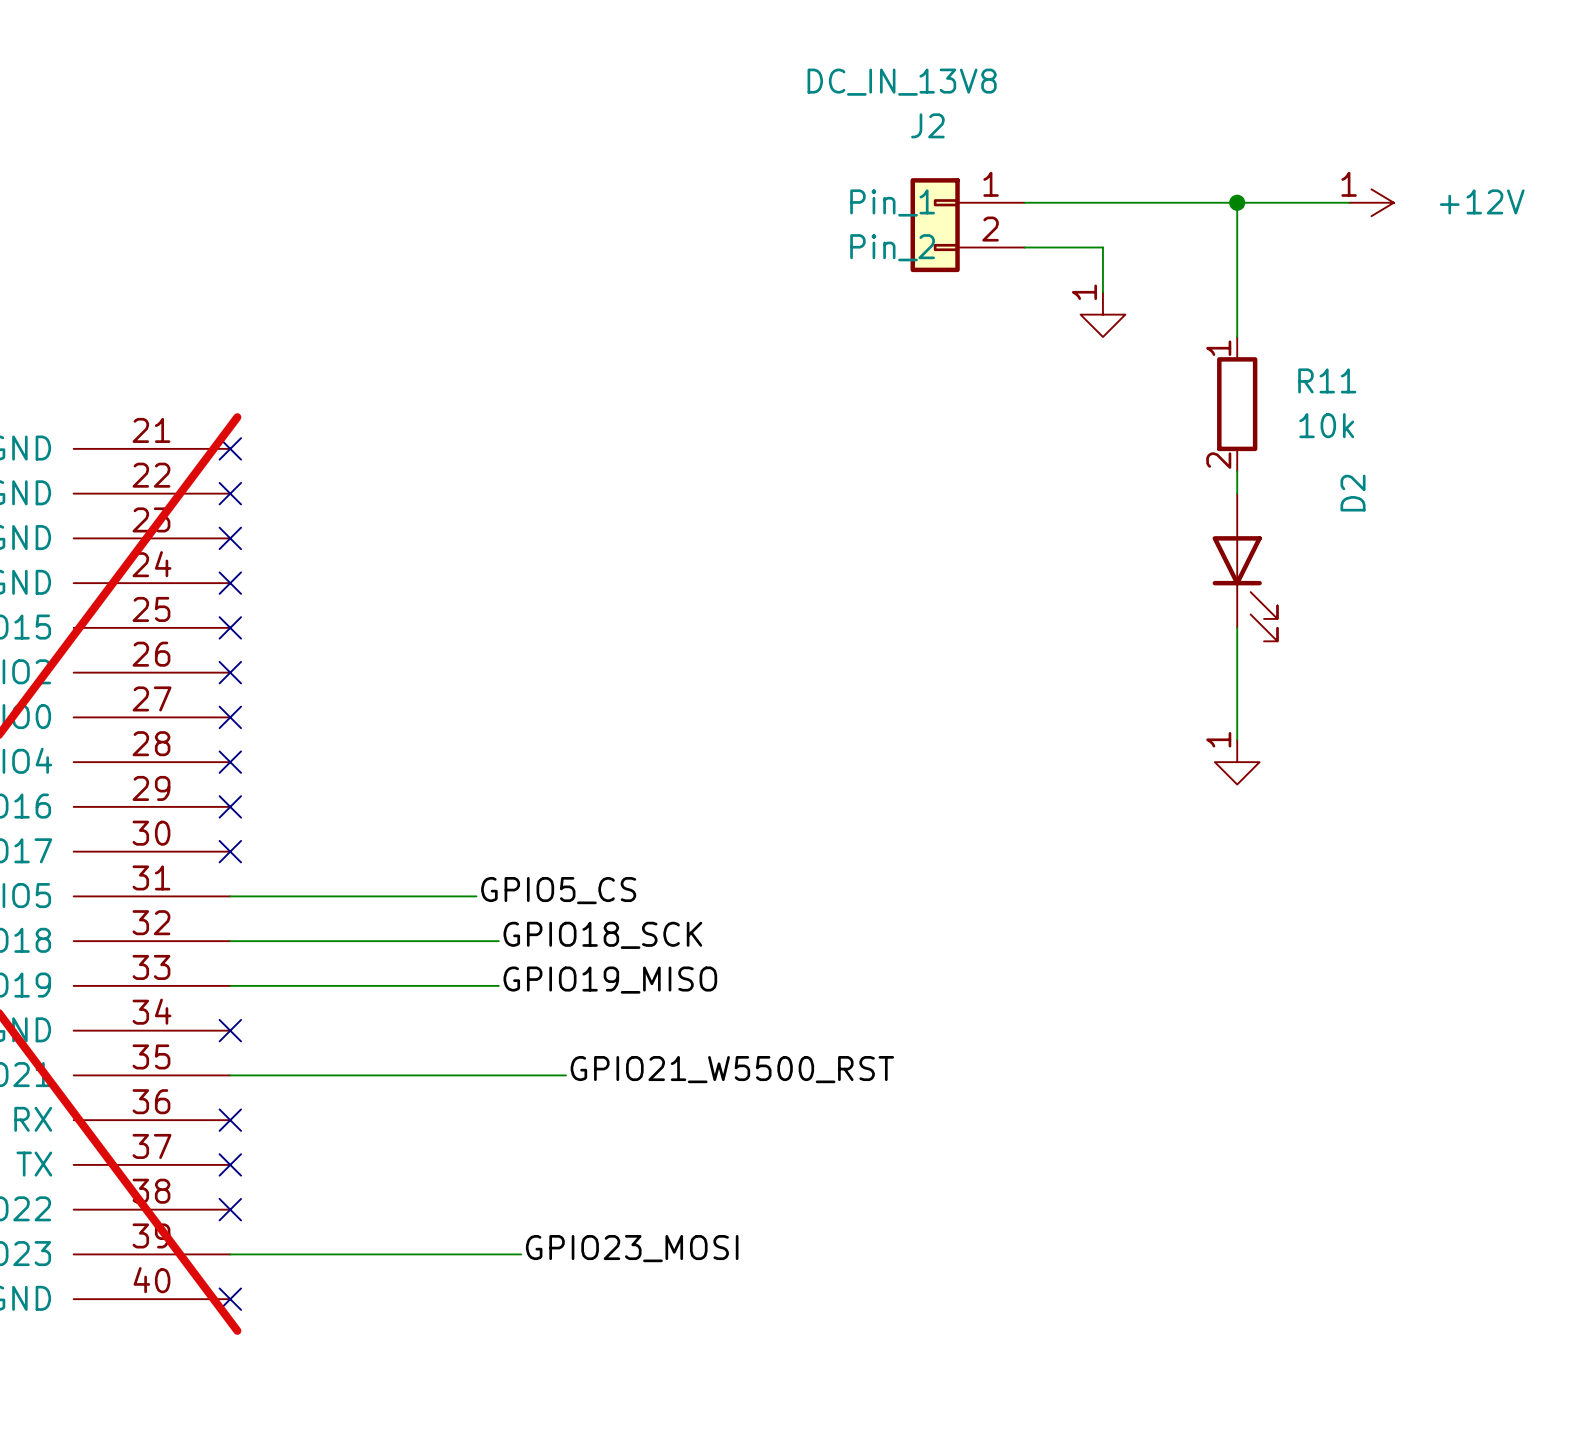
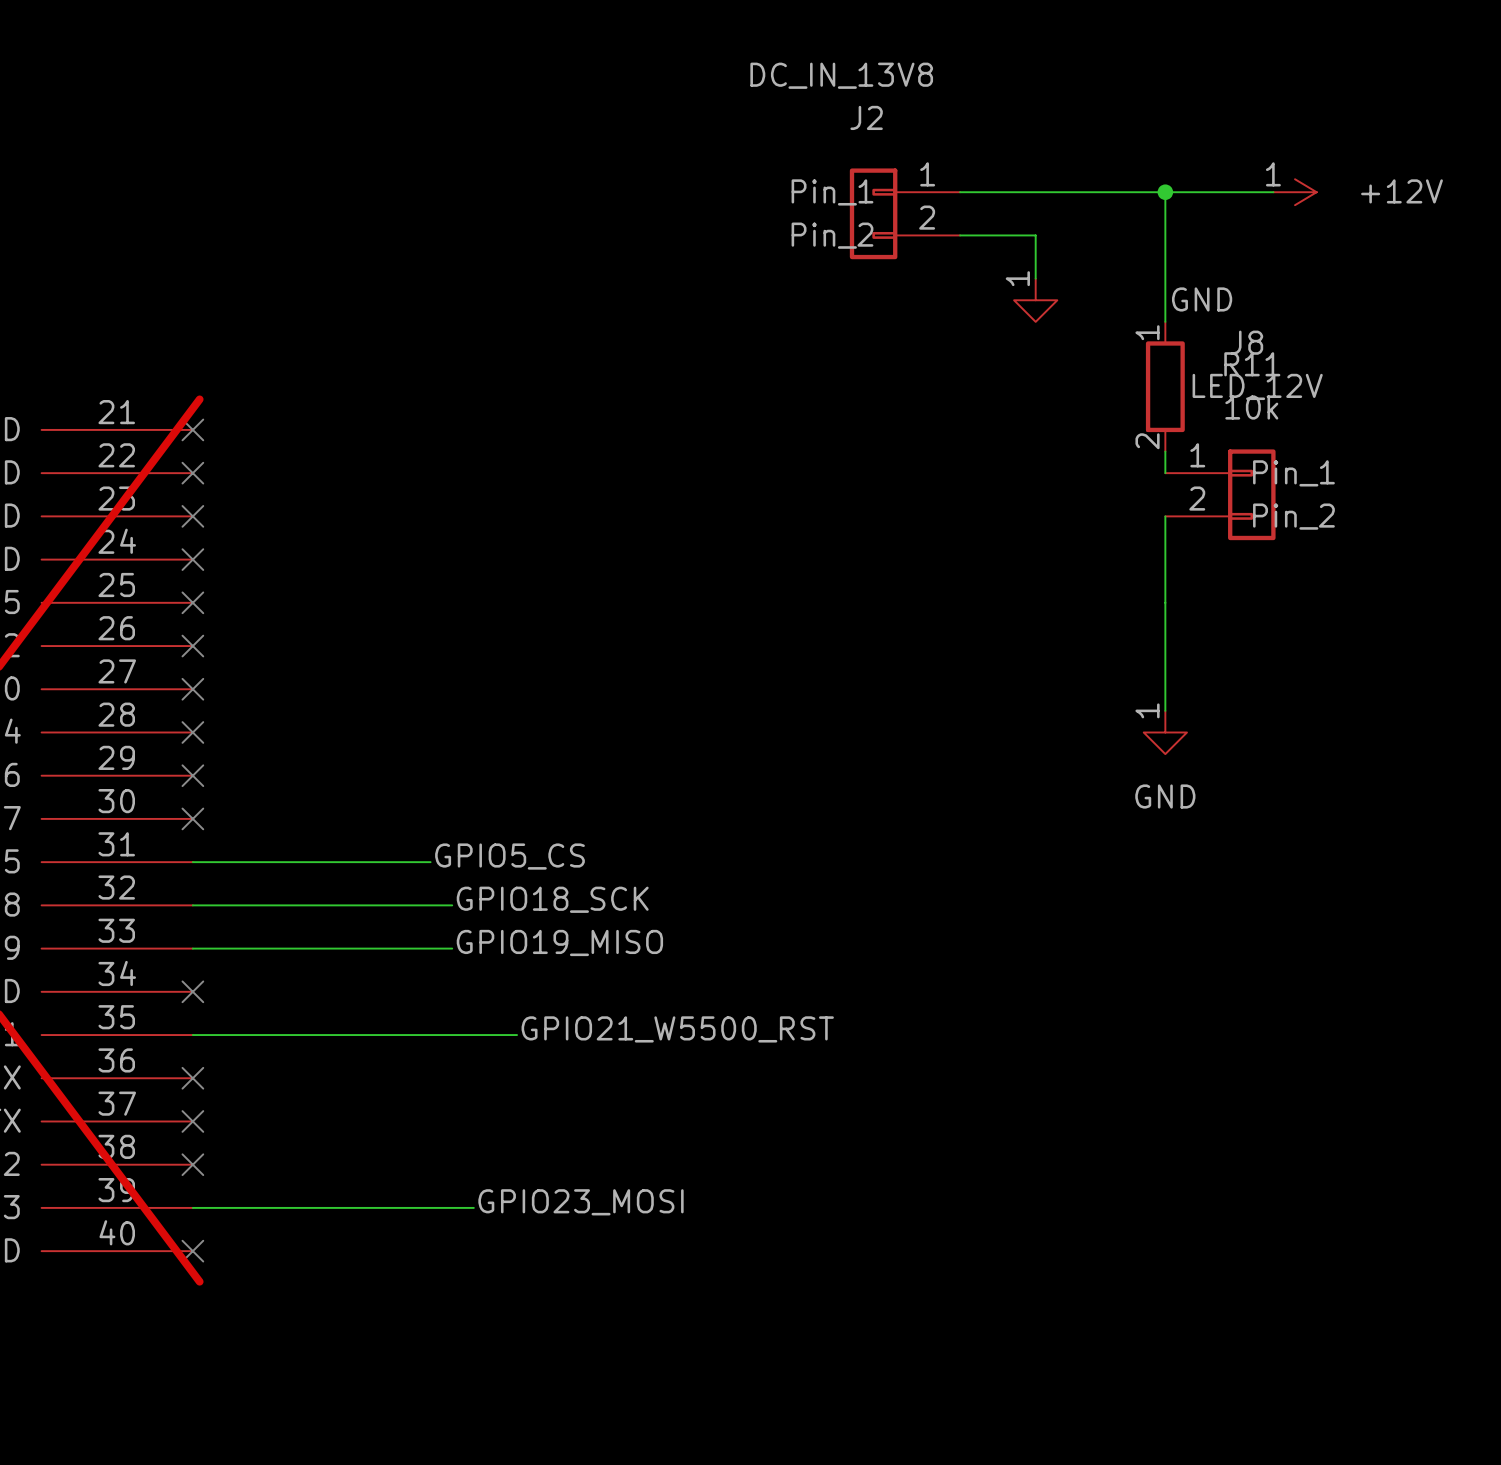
power symbol text: none -> GND (1202, 299)
J8: none -> LED_12V (1220, 494)
D2: (1245, 567) -> none
power symbol text: none -> GND (1165, 796)

